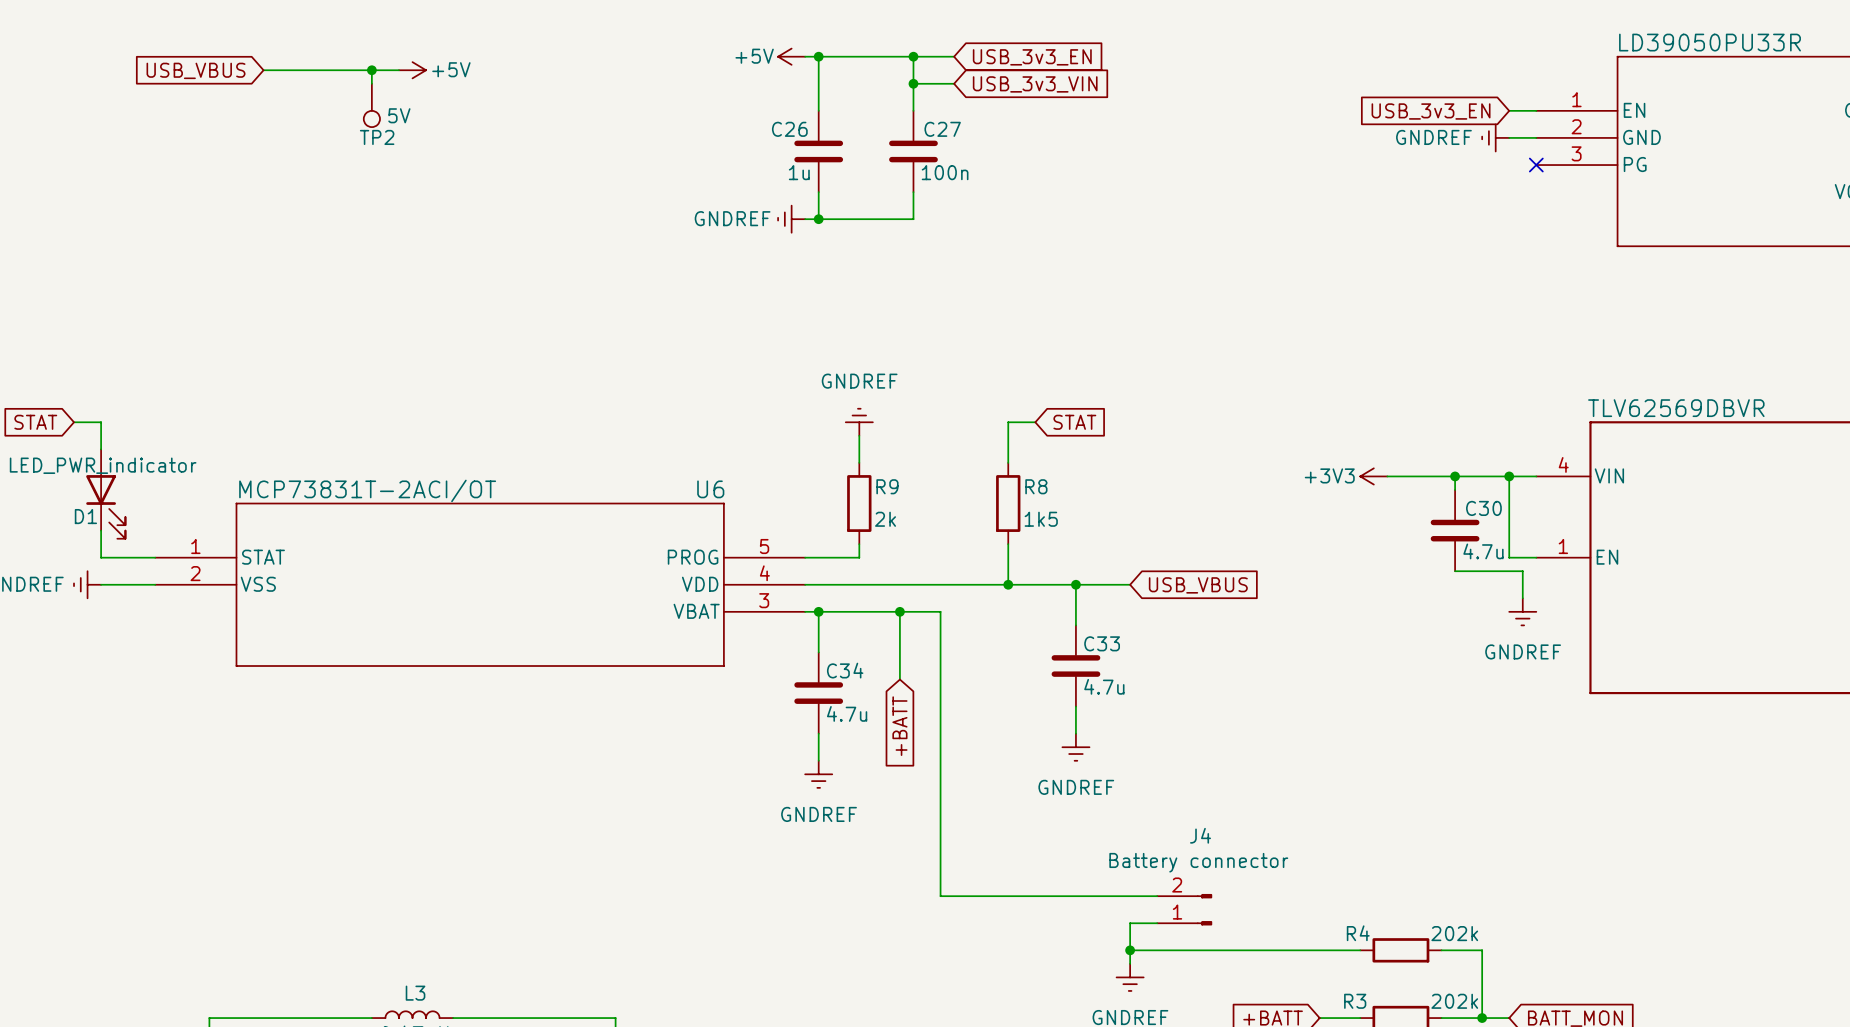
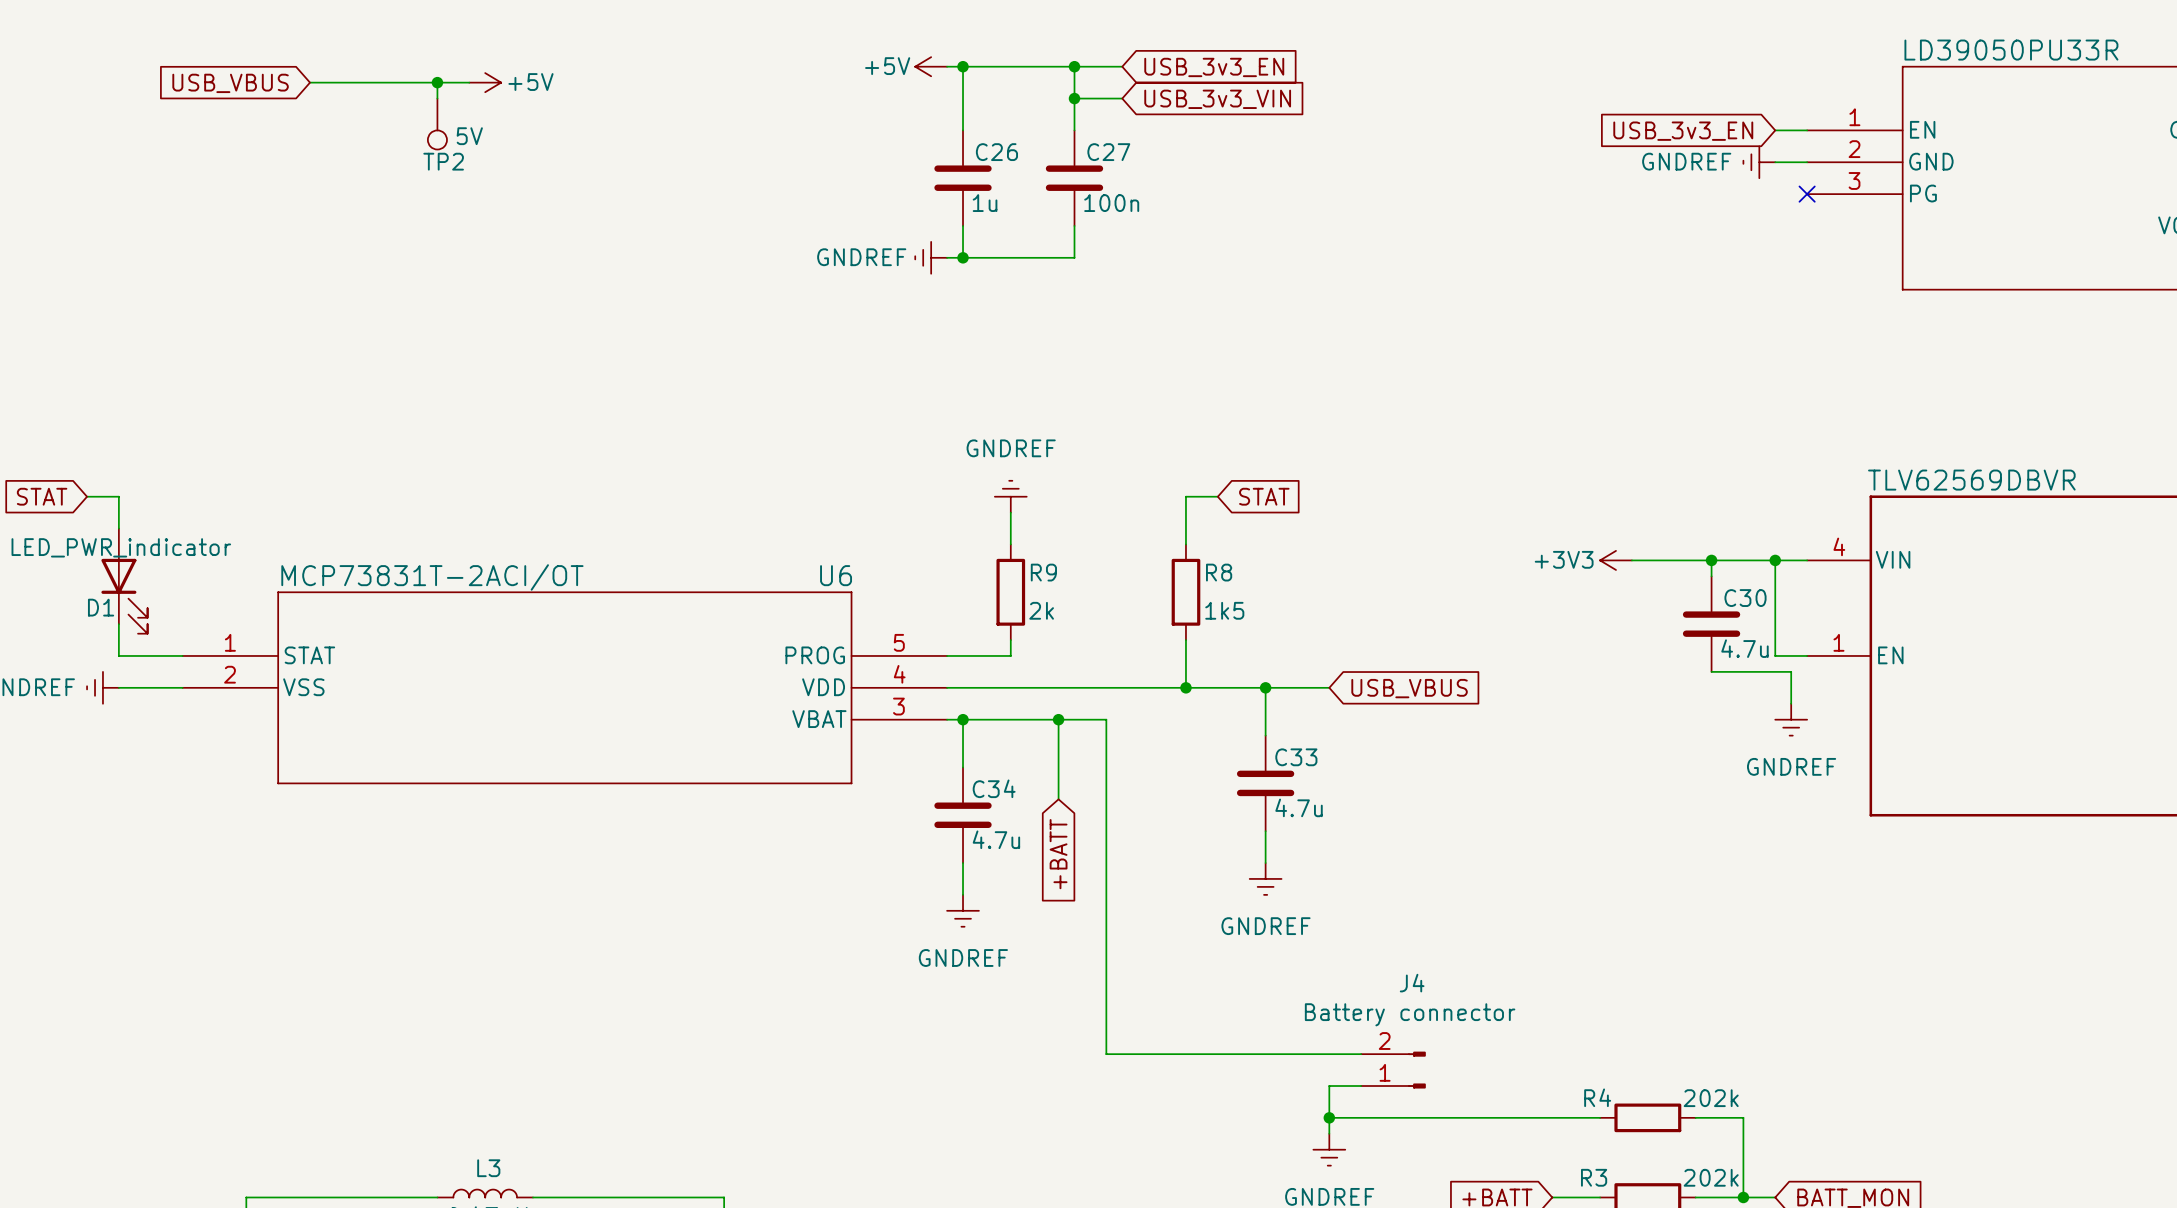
C26 name position: C26 (789, 129) -> C26 (996, 152)
C26 value position: 1u (799, 172) -> 1u (985, 203)

